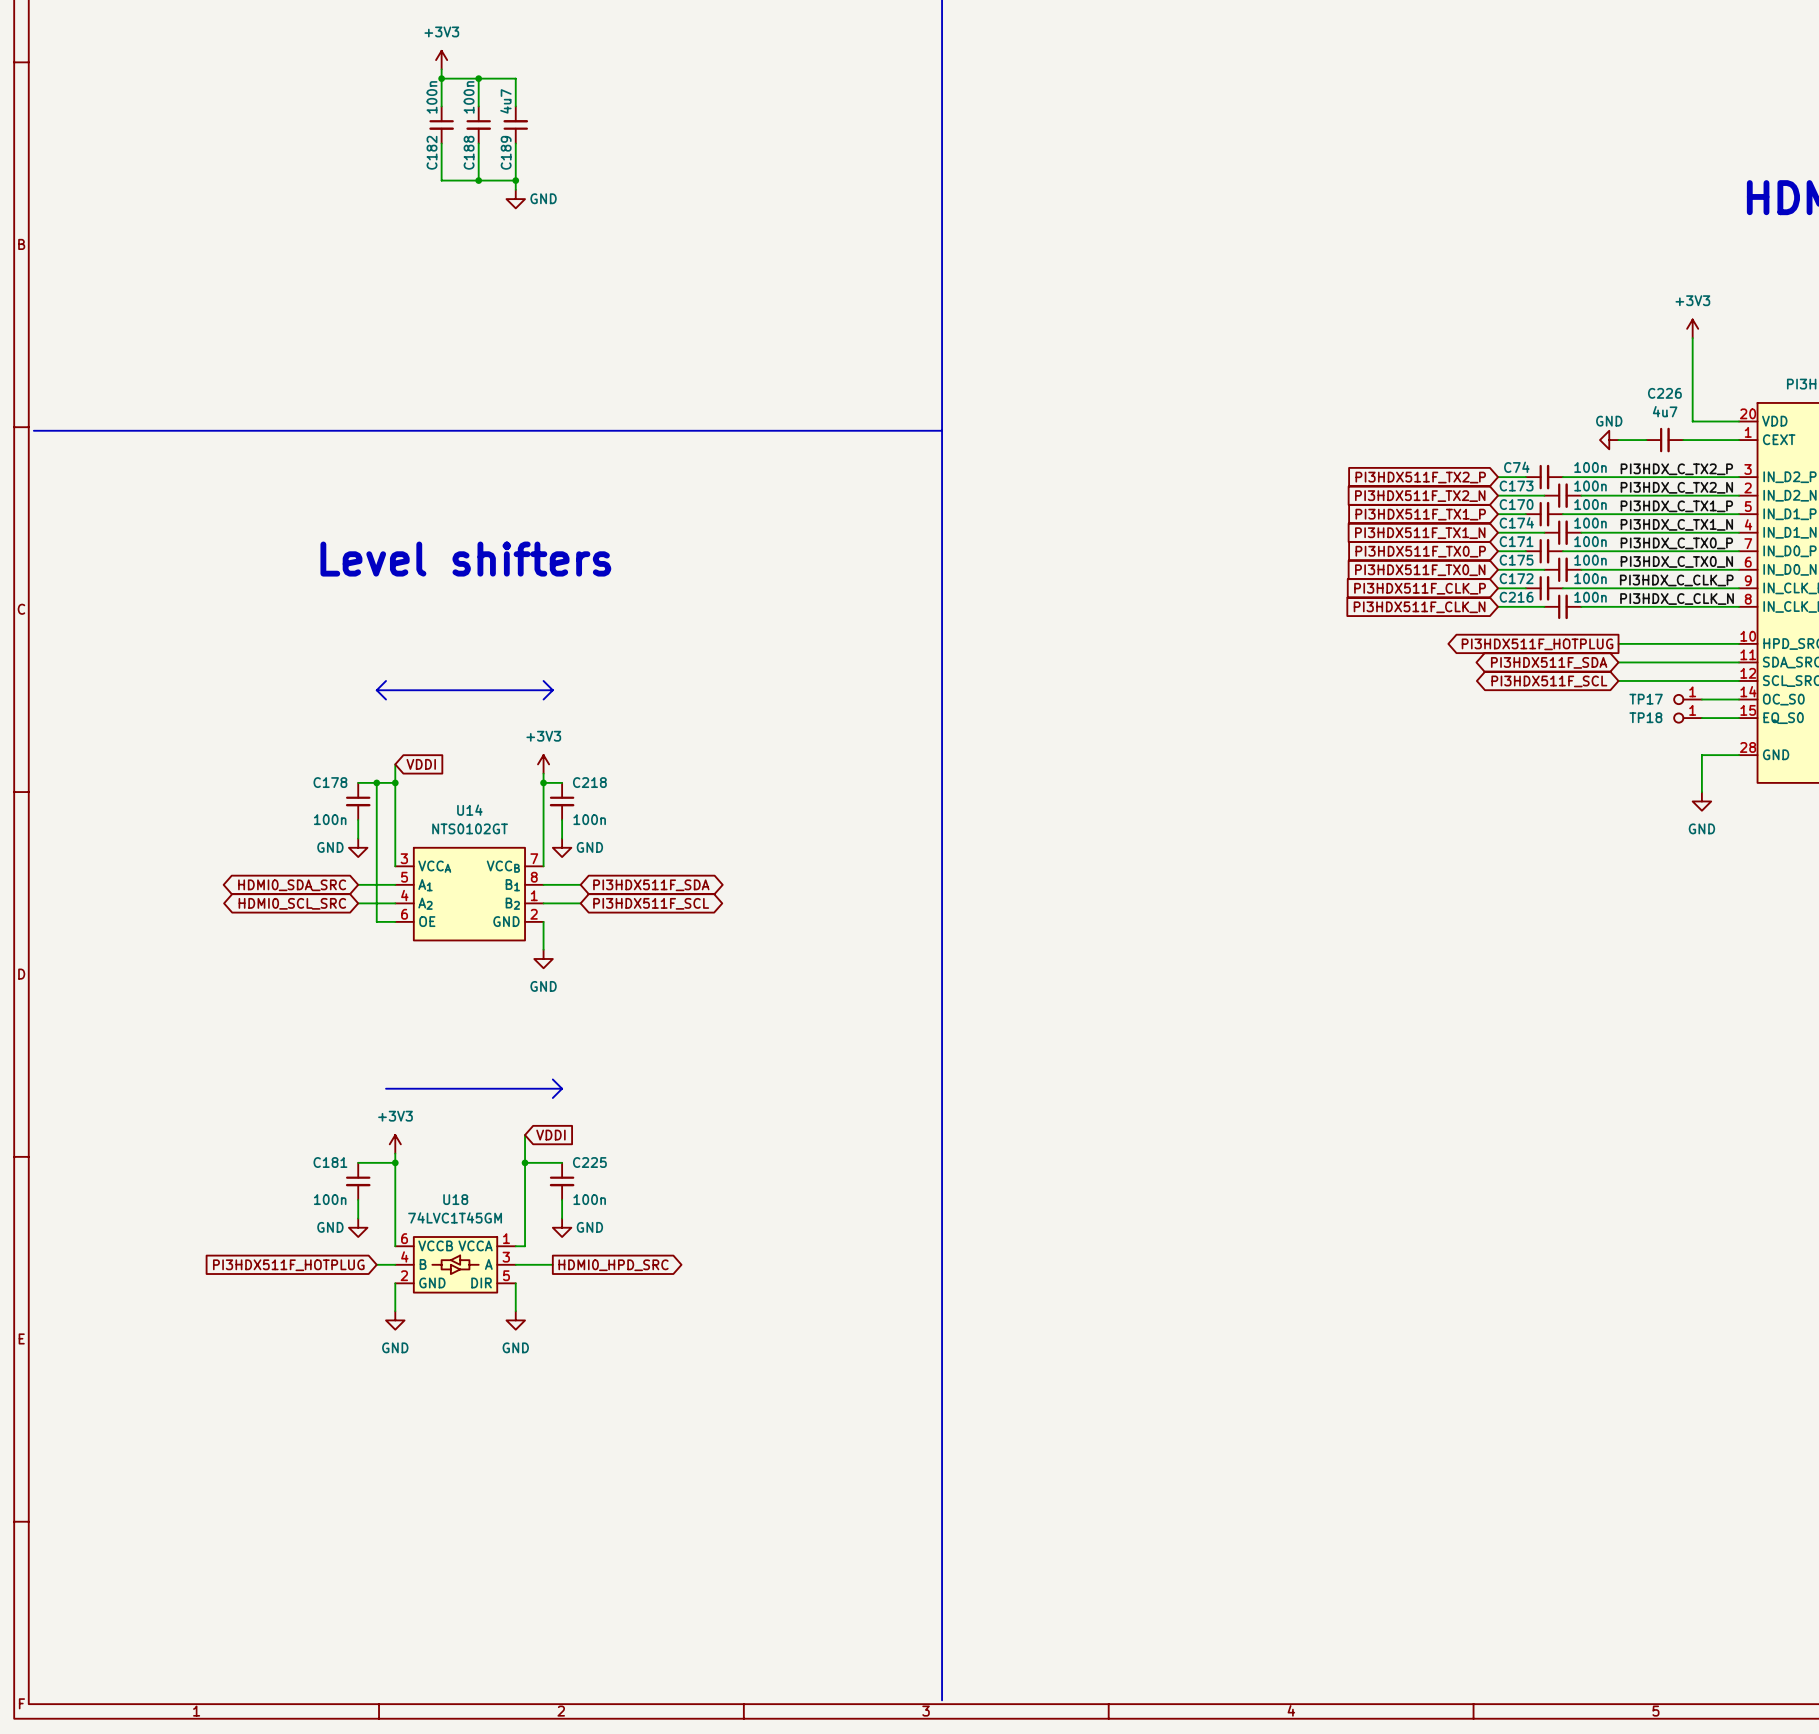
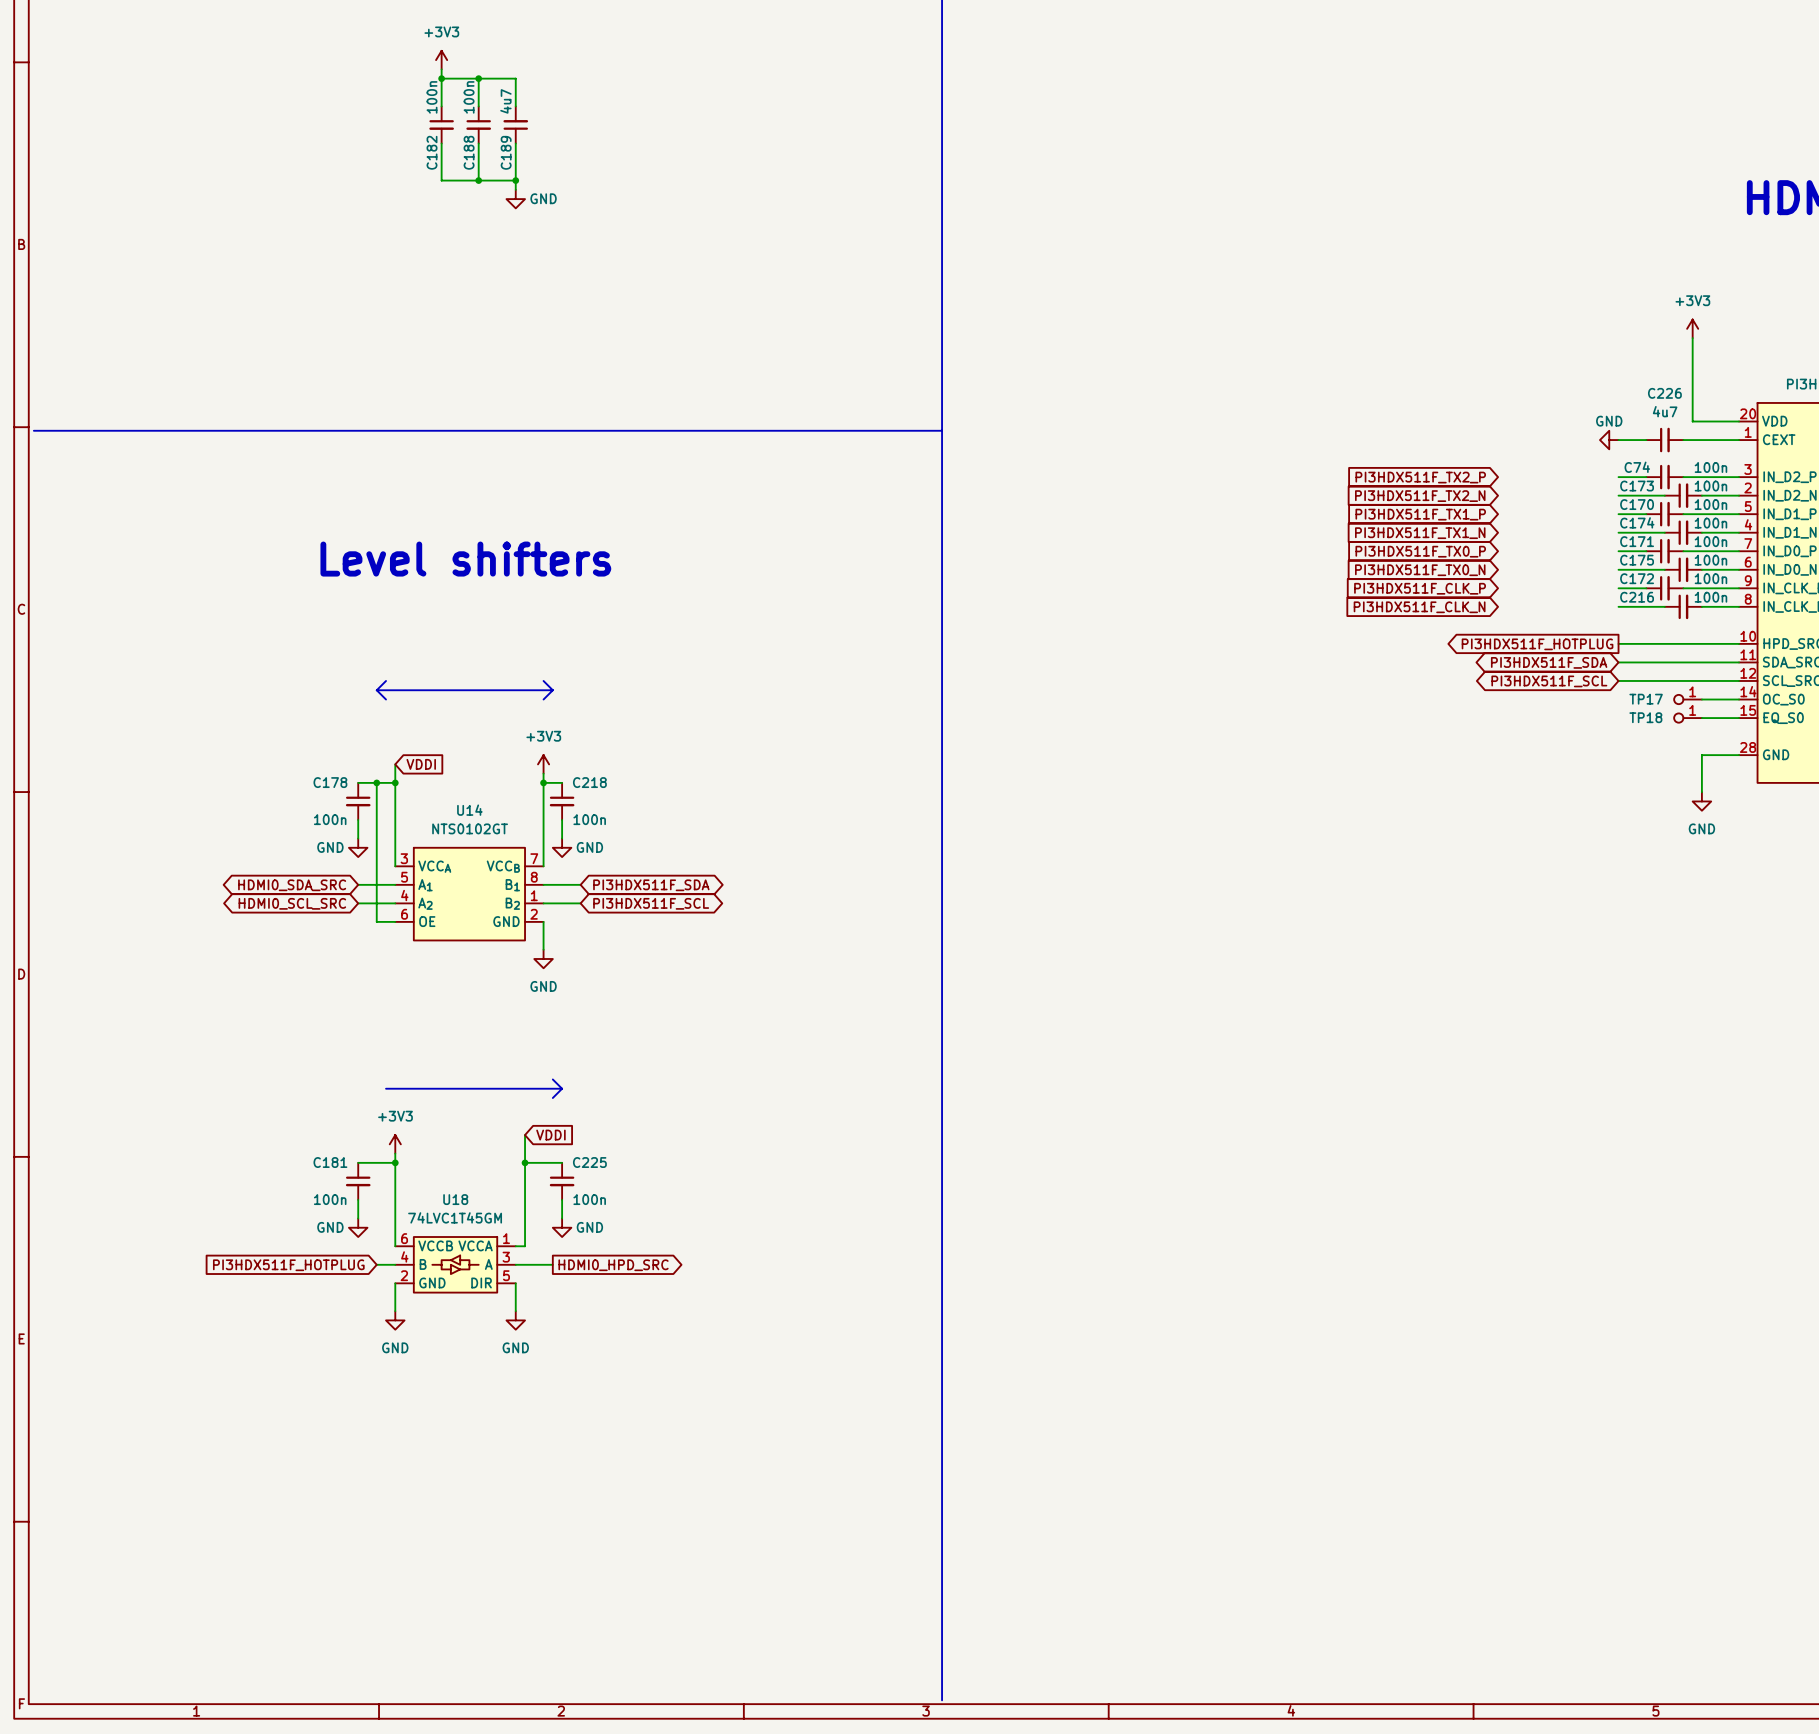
label: PI3HDX_C_TX2_P (1676, 469) -> none
wire: (1498, 477) (1525, 477) -> none
C74 position: (1544, 477) -> (1664, 477)
wire: (1562, 477) (1618, 477) -> none
label: PI3HDX_C_TX2_N (1676, 487) -> none
wire: (1498, 495) (1544, 495) -> none
C173 position: (1562, 495) -> (1683, 495)
wire: (1581, 495) (1618, 495) -> none
label: PI3HDX_C_TX1_P (1676, 506) -> none
wire: (1498, 514) (1525, 514) -> none
C170 position: (1544, 514) -> (1664, 514)
wire: (1562, 514) (1618, 514) -> none
label: PI3HDX_C_TX1_N (1676, 524) -> none
wire: (1498, 532) (1544, 532) -> none
C174 position: (1562, 532) -> (1683, 532)
wire: (1581, 532) (1618, 532) -> none
label: PI3HDX_C_TX0_P (1676, 543) -> none
wire: (1498, 551) (1525, 551) -> none
C171 position: (1544, 551) -> (1664, 551)
wire: (1562, 551) (1618, 551) -> none
label: PI3HDX_C_TX0_N (1676, 561) -> none
wire: (1498, 569) (1544, 569) -> none
C175 position: (1562, 569) -> (1683, 569)
wire: (1581, 569) (1618, 569) -> none
label: PI3HDX_C_CLK_P (1676, 580) -> none
wire: (1498, 588) (1525, 588) -> none
C172 position: (1544, 588) -> (1664, 588)
wire: (1562, 588) (1618, 588) -> none
label: PI3HDX_C_CLK_N (1677, 599) -> none
wire: (1498, 606) (1544, 606) -> none
C216 position: (1562, 606) -> (1683, 606)
wire: (1581, 606) (1618, 606) -> none

